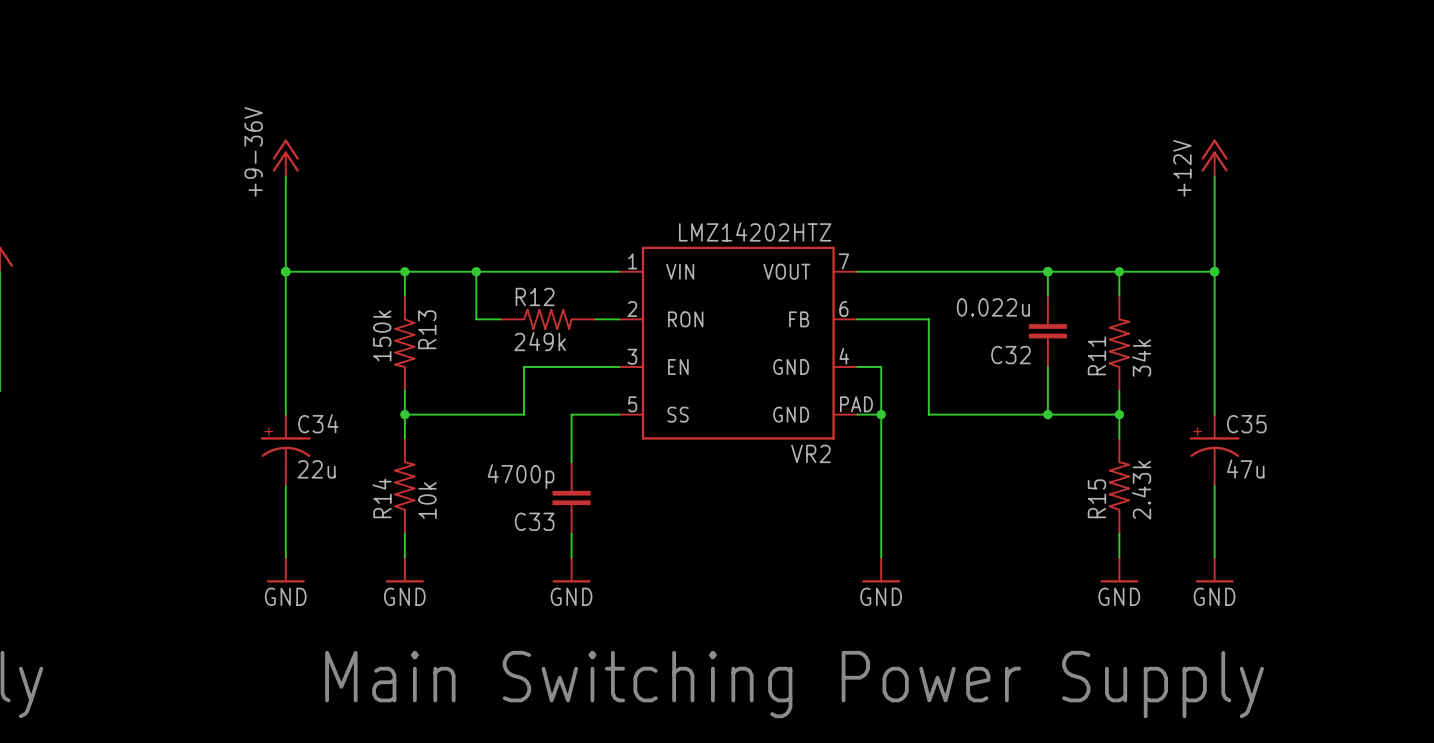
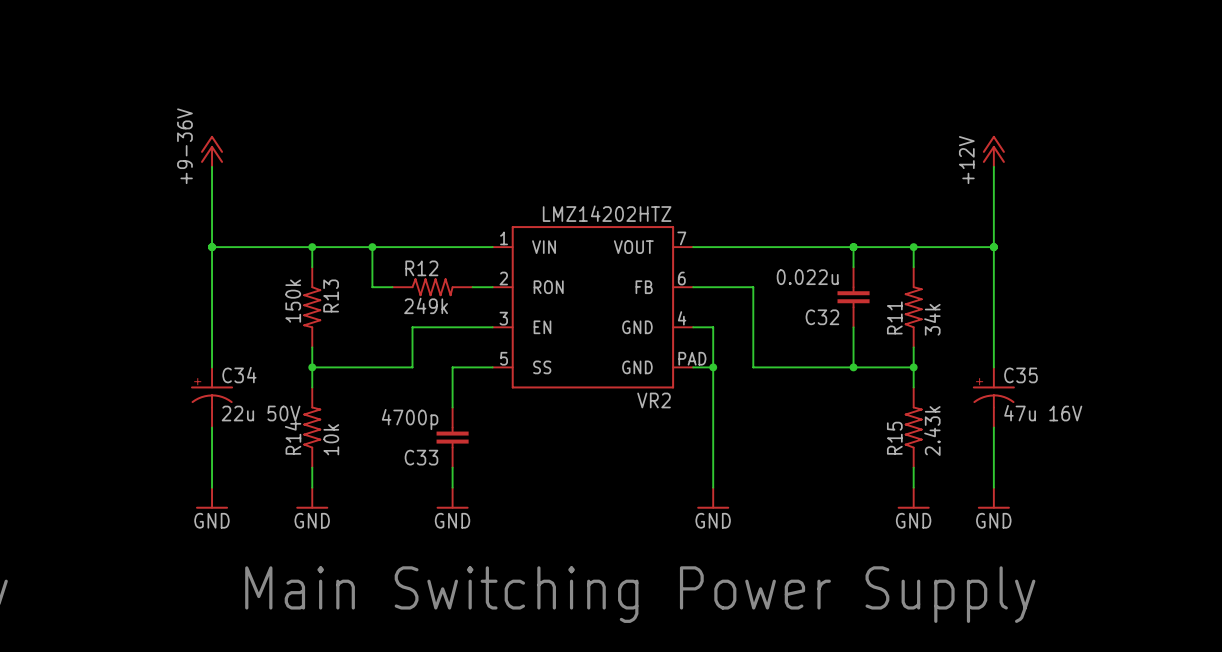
C34 value: 22u (316, 469) -> 22u 50V (261, 413)
C35 value: 47u (1245, 469) -> 47u 16V (1043, 413)

